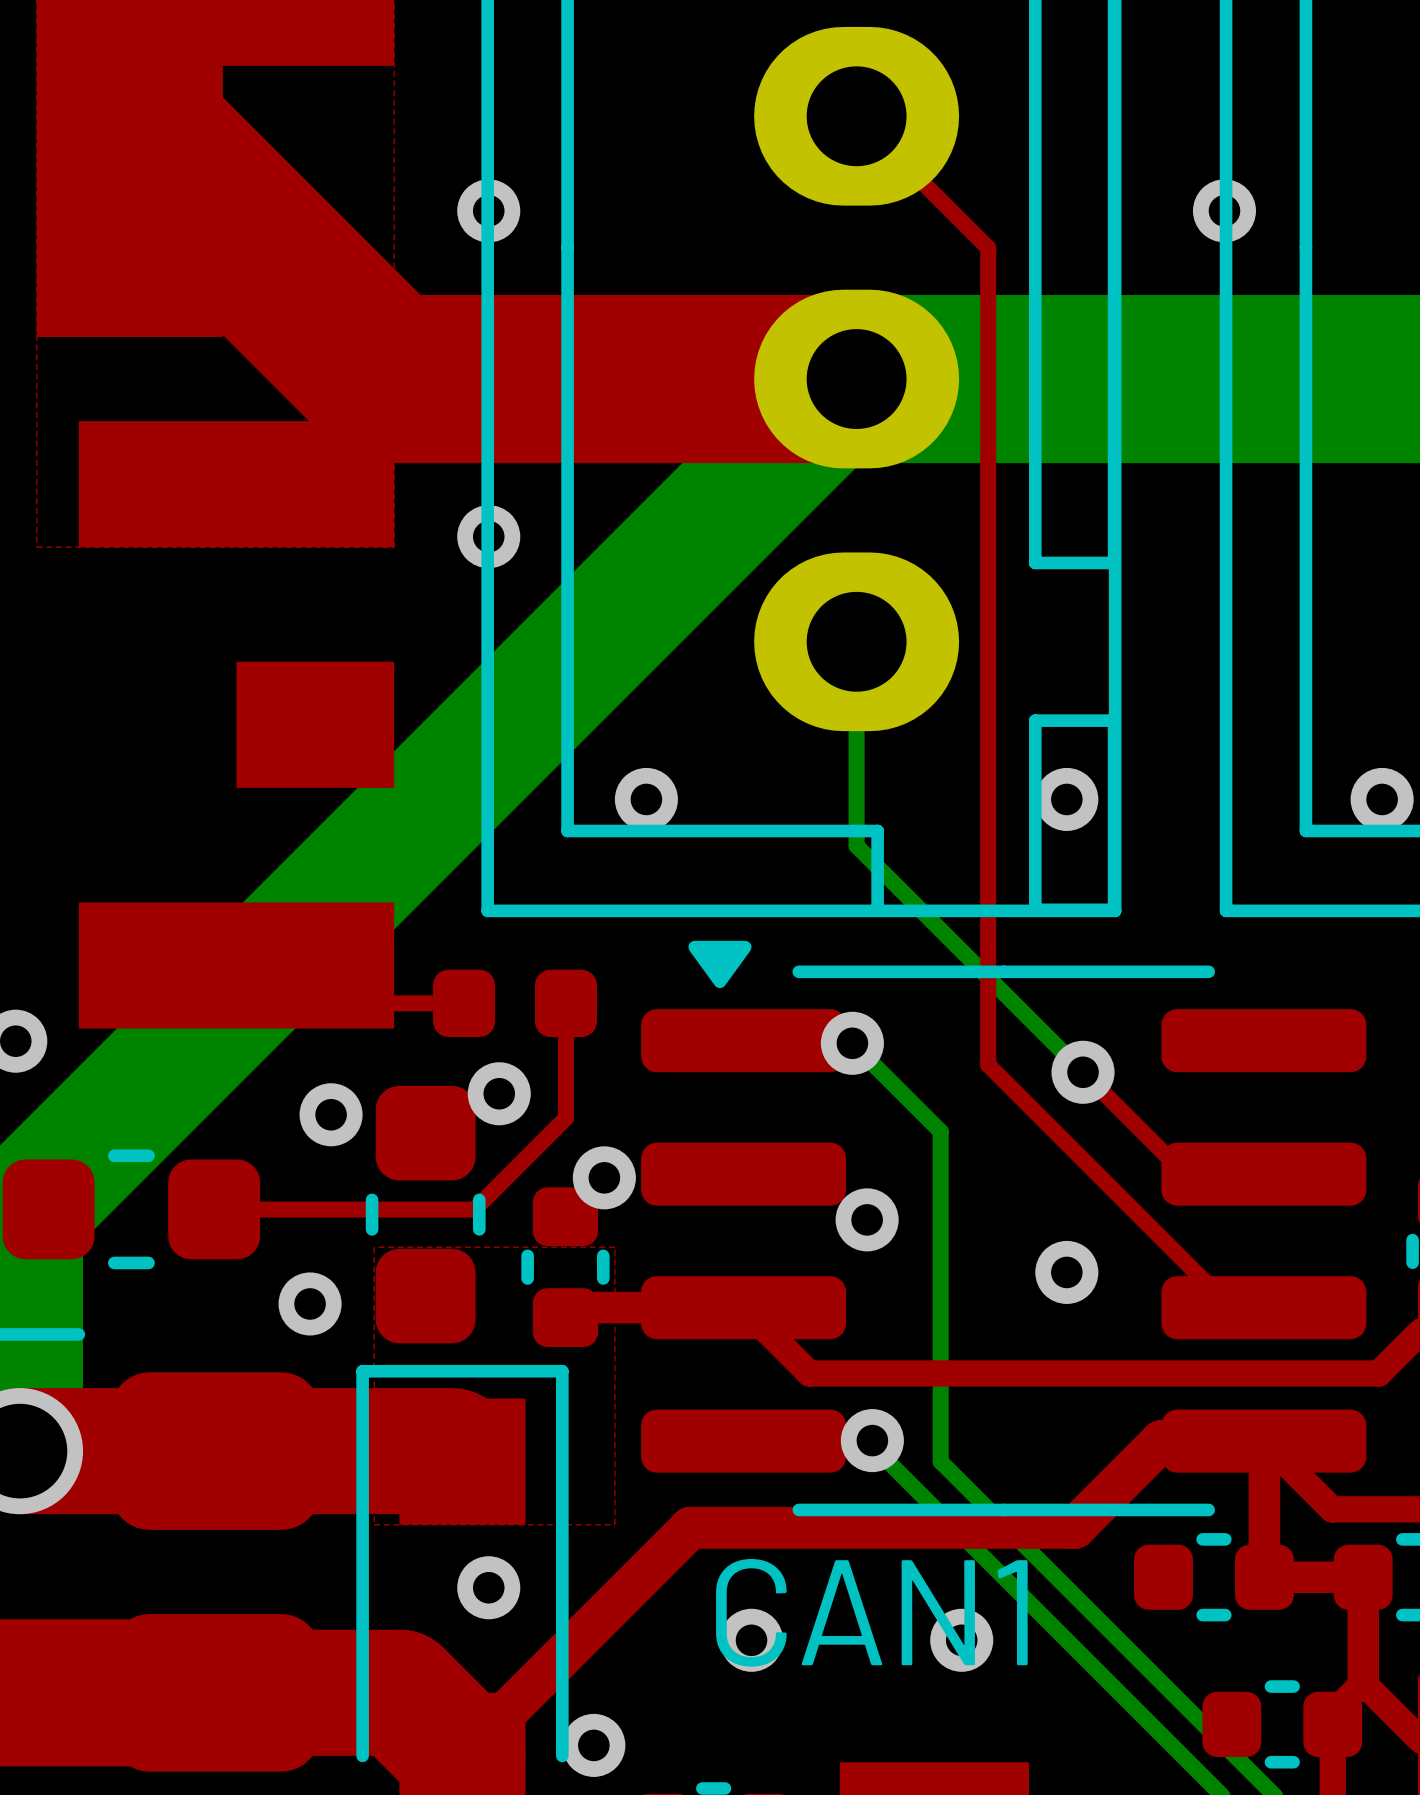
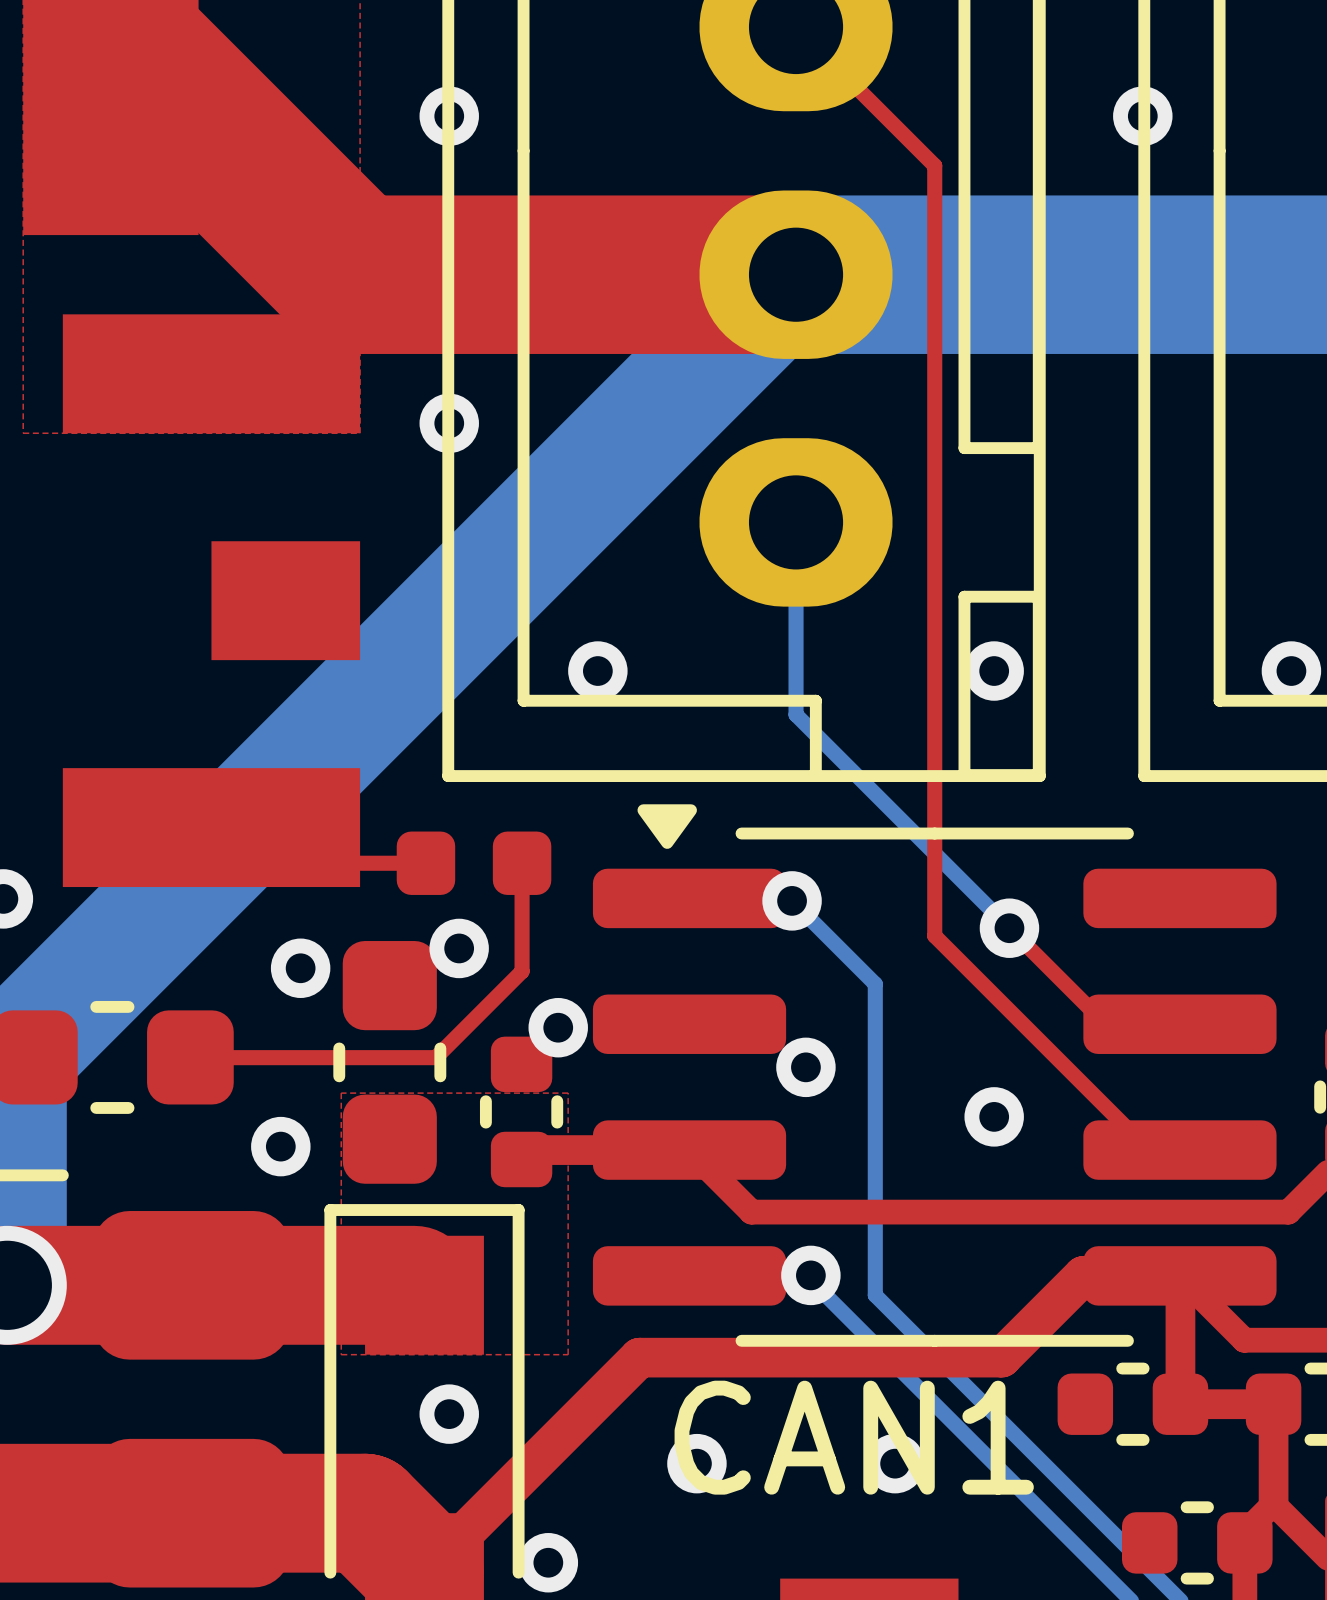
top track: (988, 247) (988, 1064) (1003, 1080) -> (920, 151) (934, 165) (934, 935)

